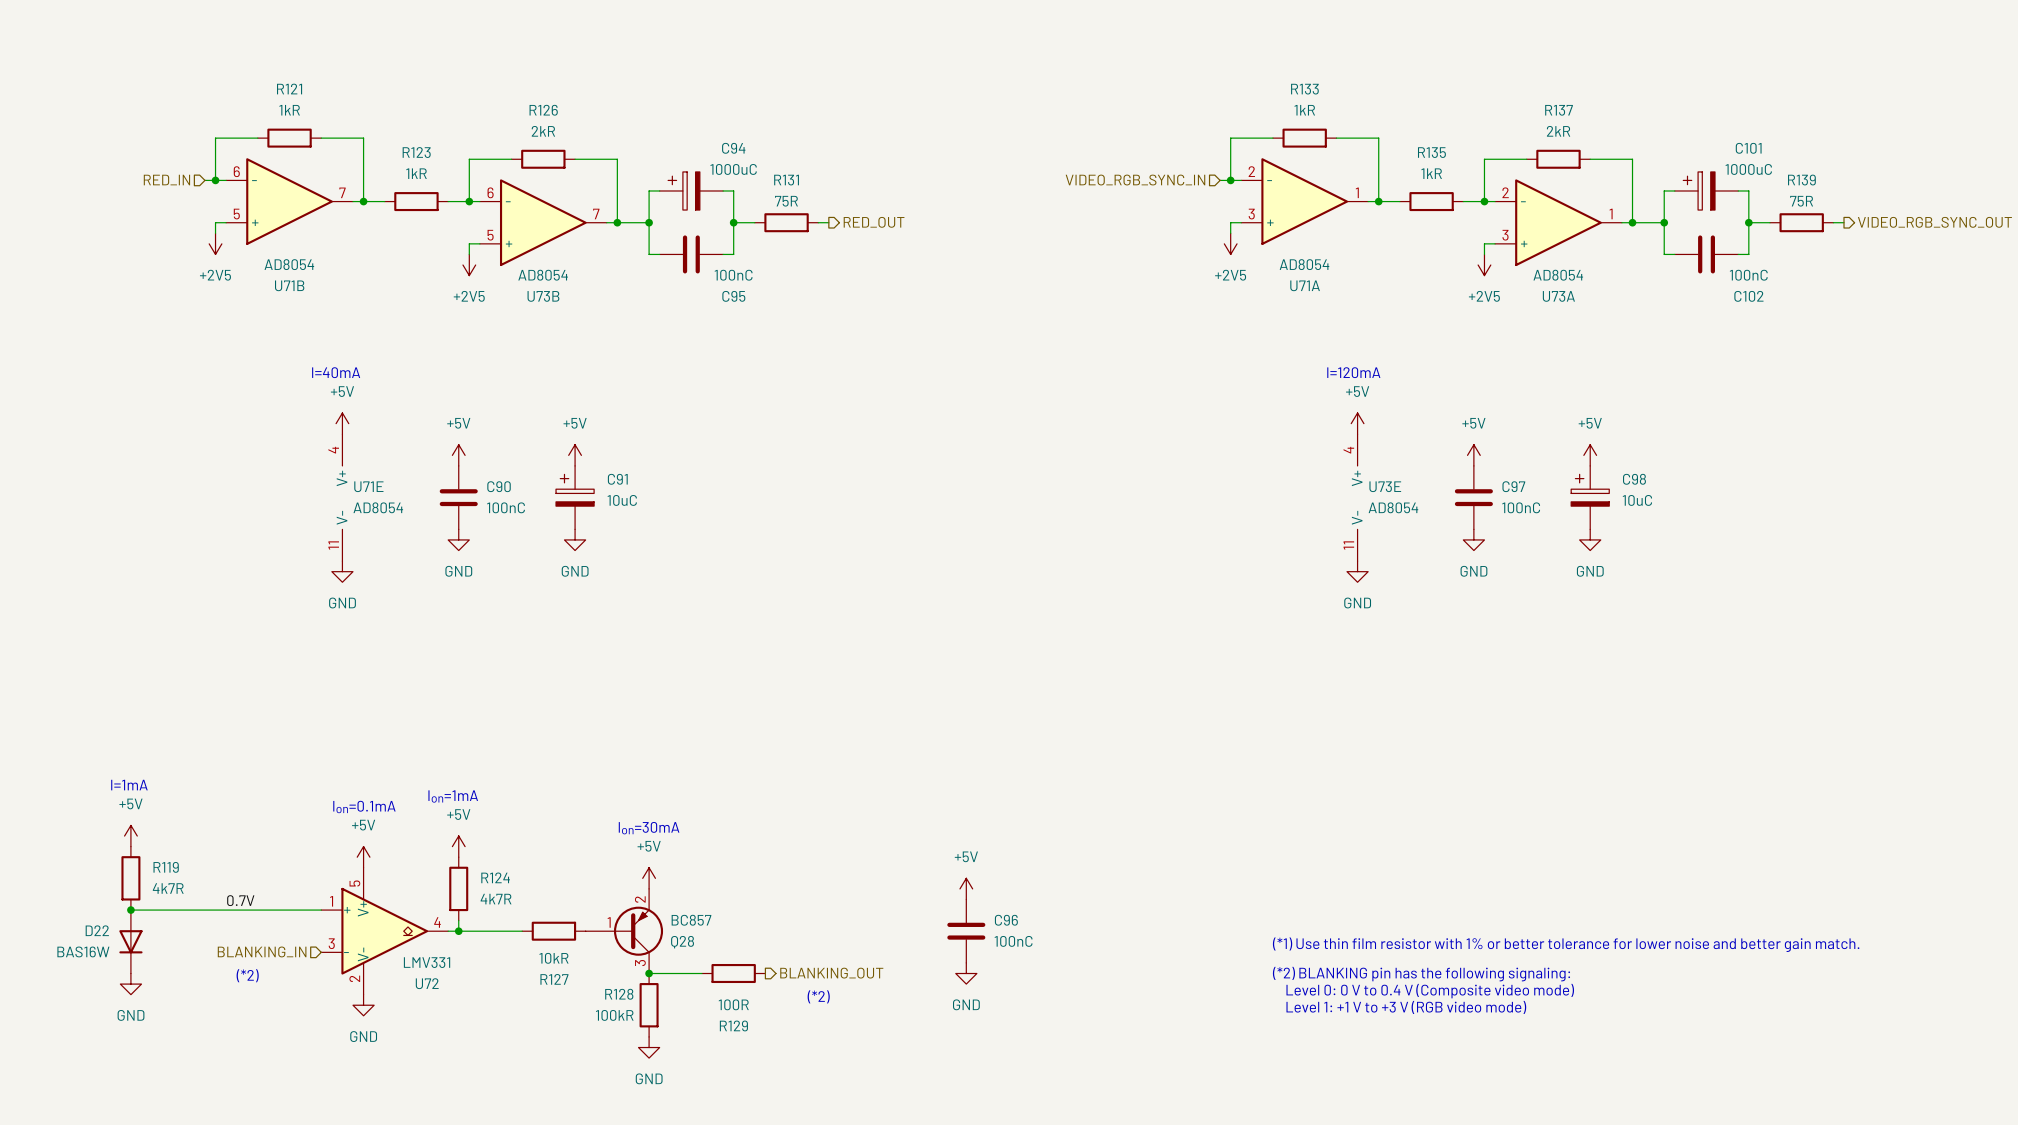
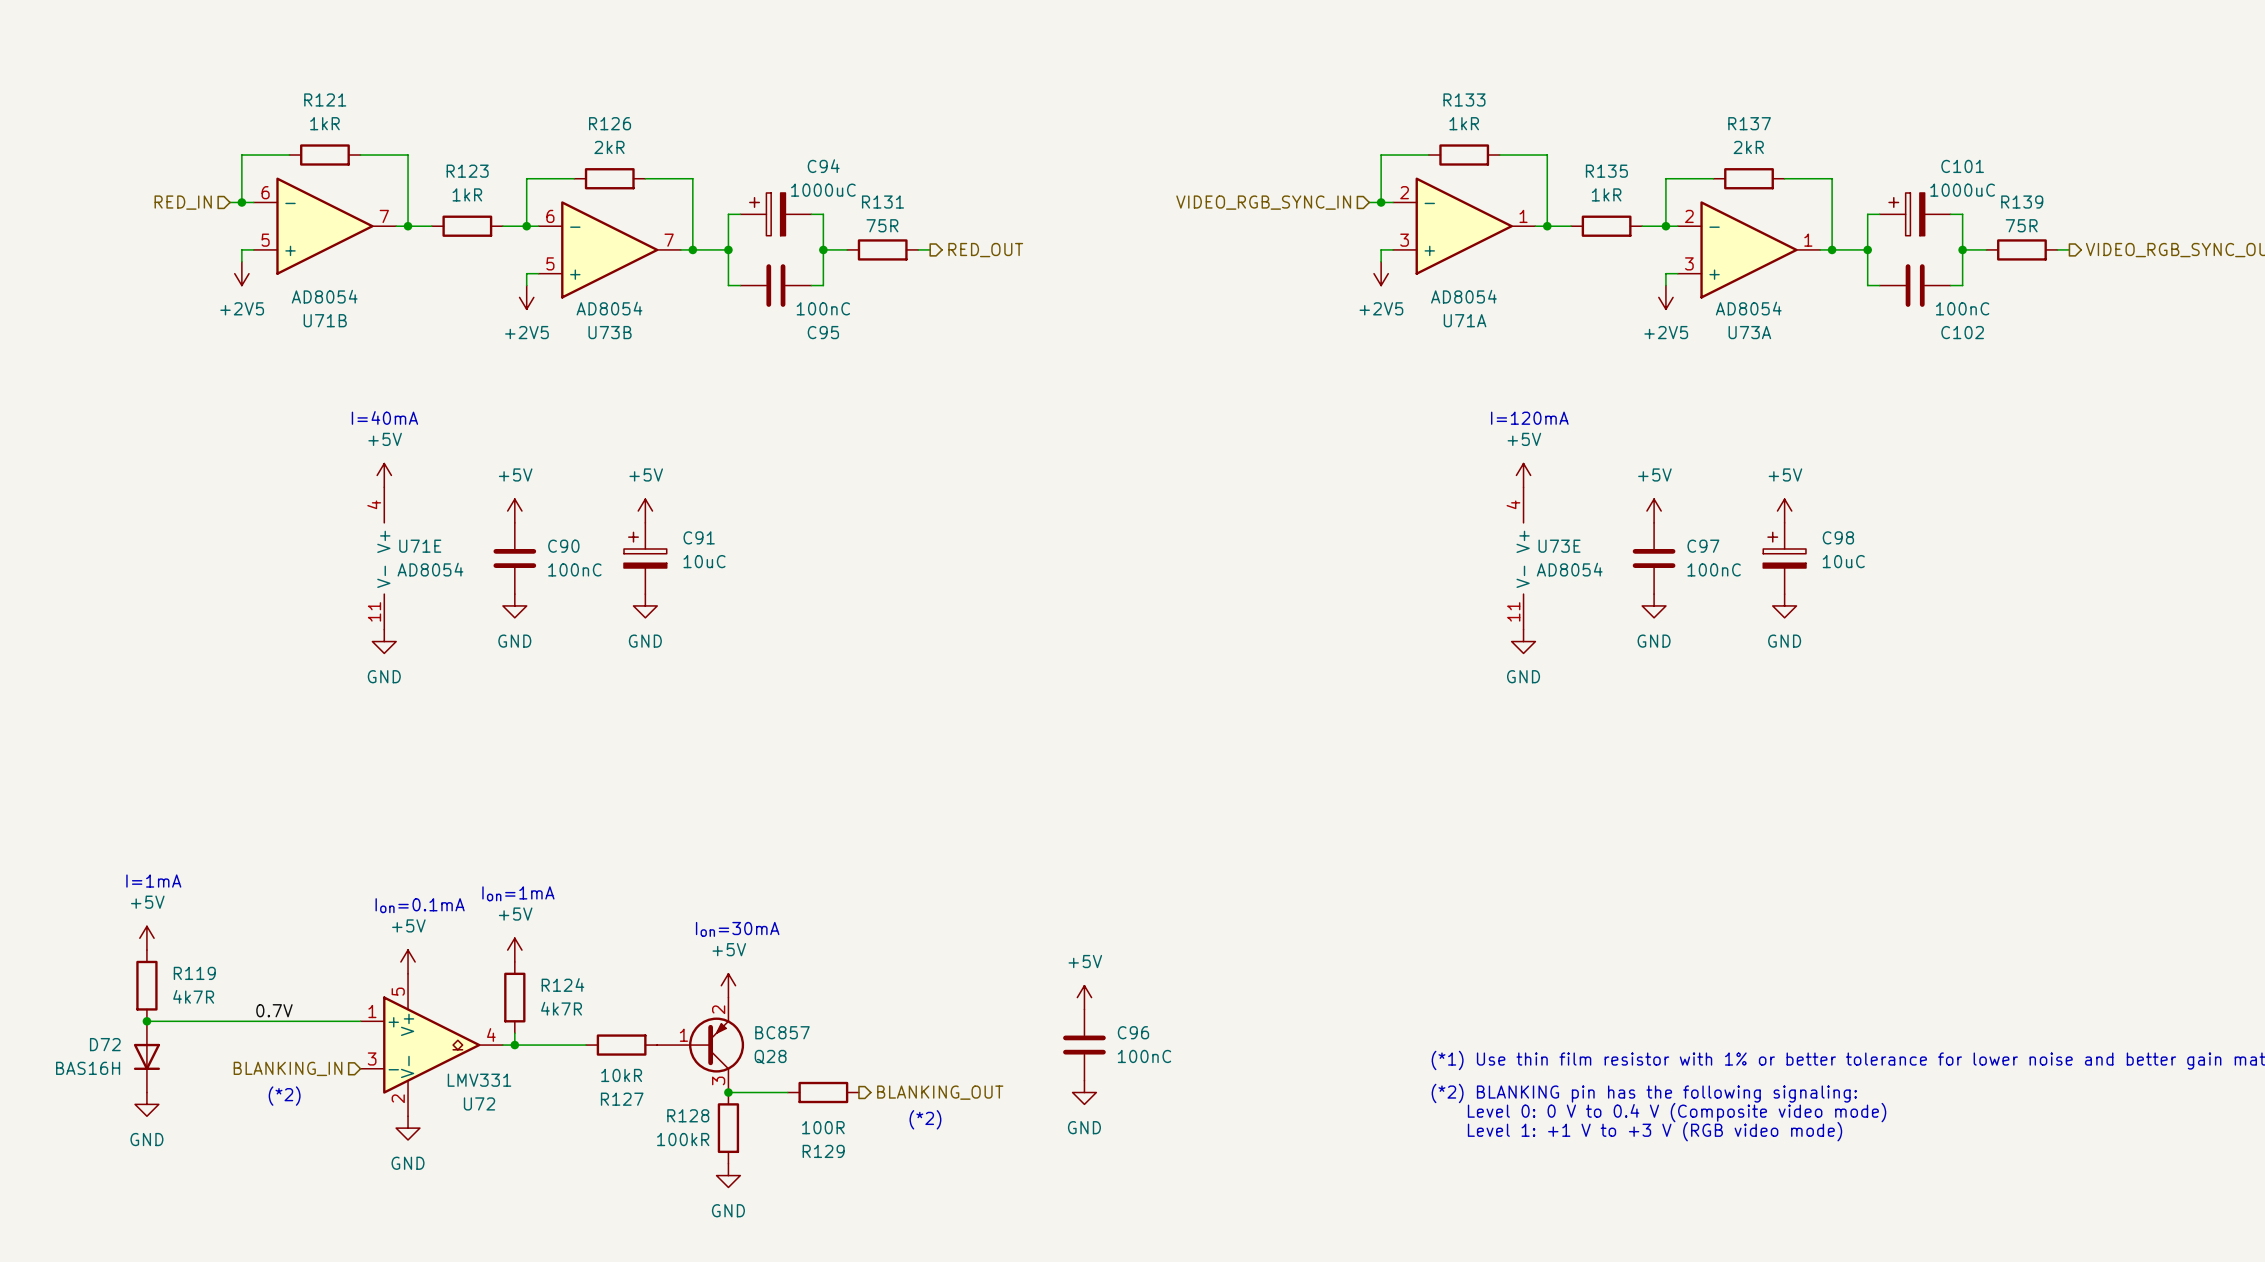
D22 name: D22 (97, 930) -> D72 (105, 1044)
D22 value: BAS16W (83, 951) -> BAS16H (88, 1068)

